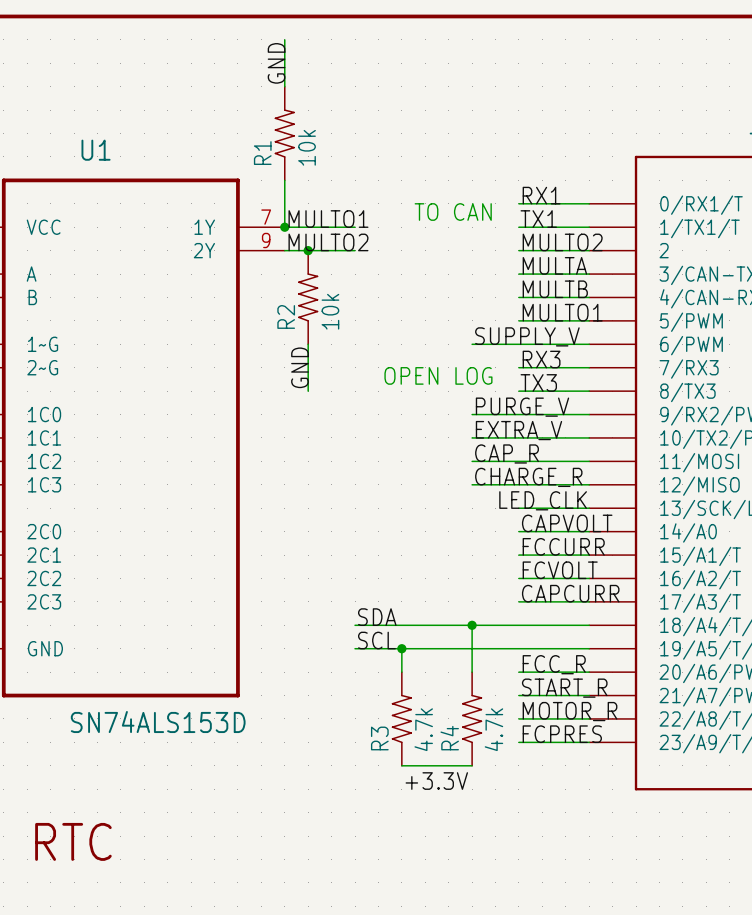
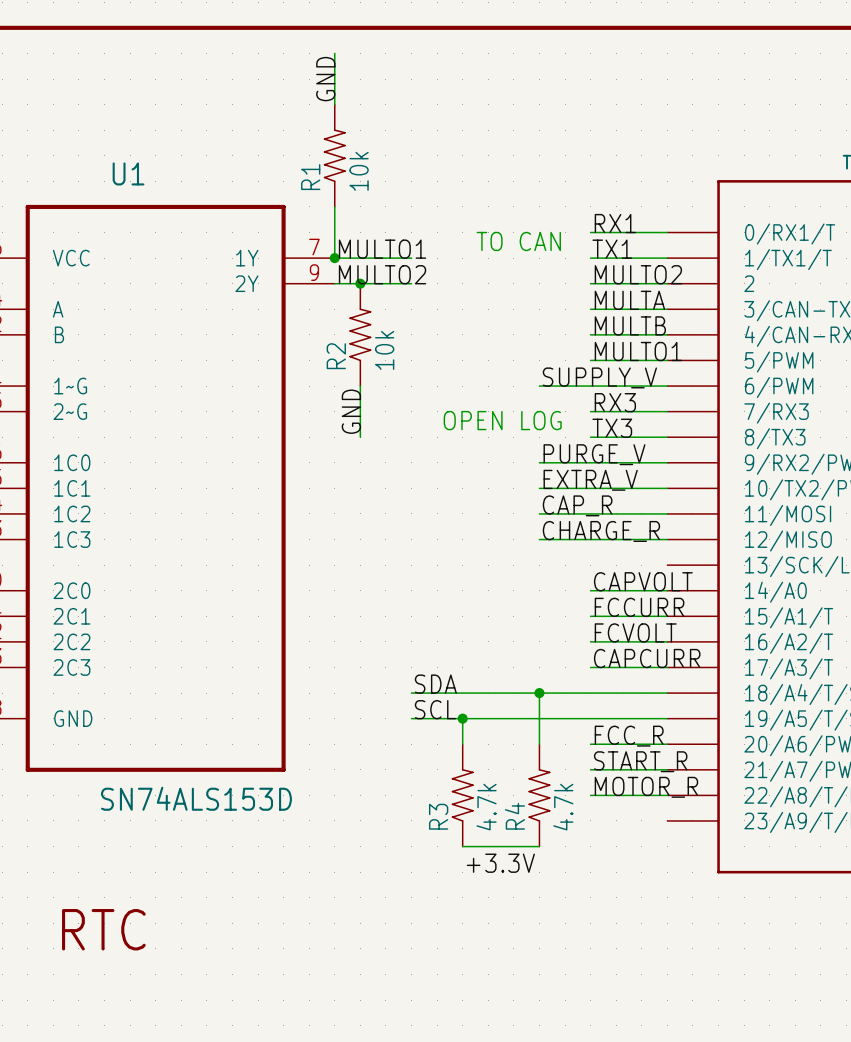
label: LED_CLK (543, 500) -> none
wire: (518, 508) (589, 508) -> none
label: FCPRES (562, 734) -> none
wire: (518, 742) (589, 742) -> none

